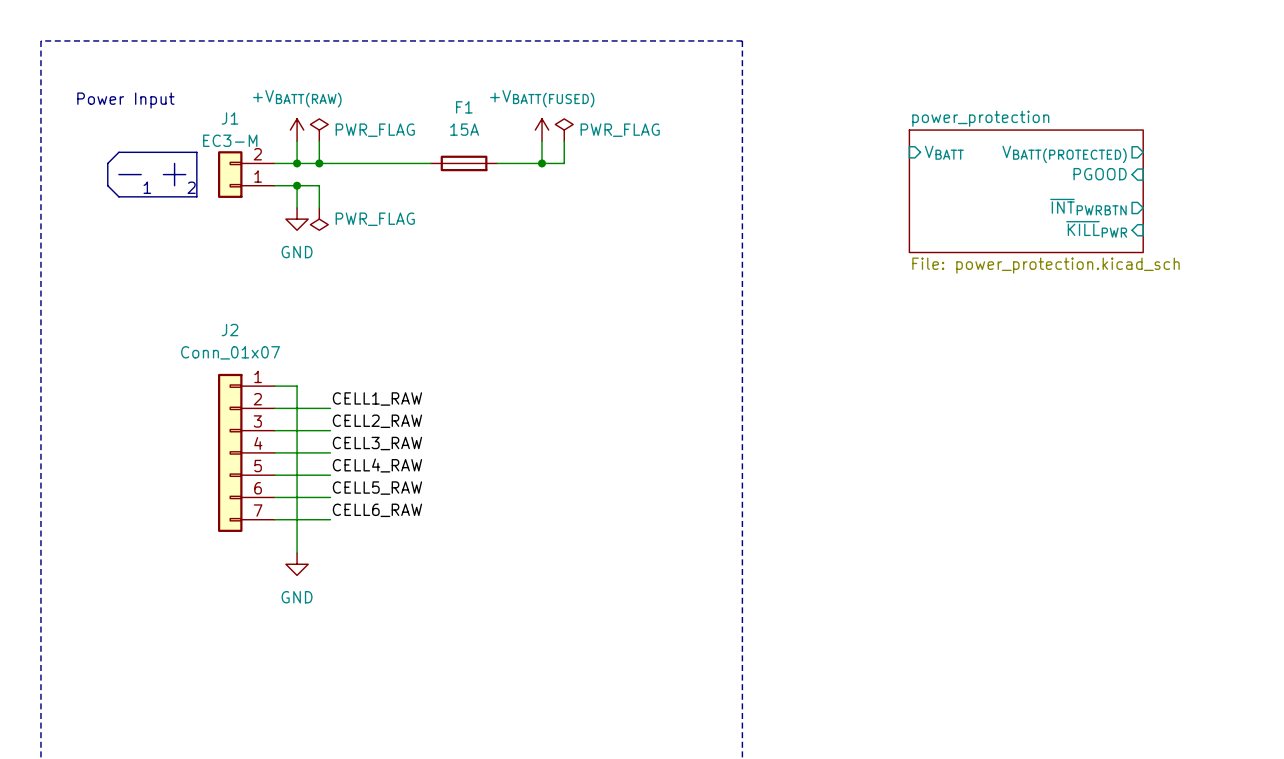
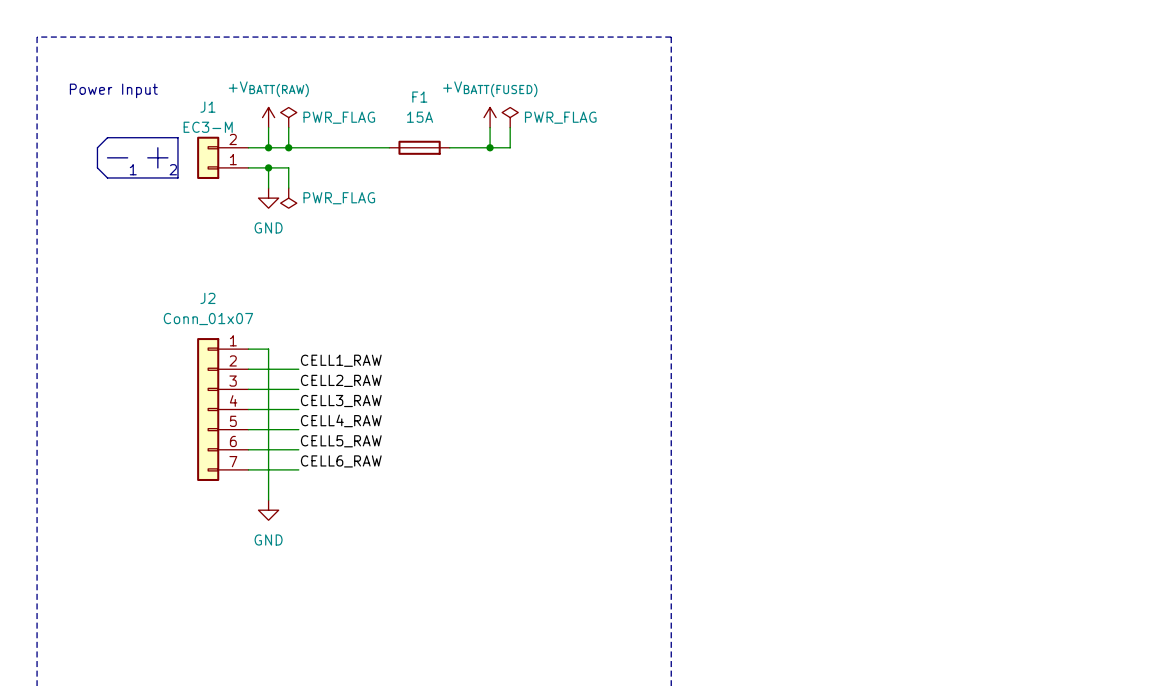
sheet pin: VBATT (944, 152) -> none
sheet pin: VBATT(PROTECTED) (1064, 154) -> none
sheet pin: PGOOD (1100, 174) -> none
sheet power_protection: File: power_protection.kicad_sch (1026, 191) -> none
sheet pin: ~{INT}PWRBTN (1088, 207) -> none
sheet pin: ~{KILL}PWR (1096, 229) -> none

